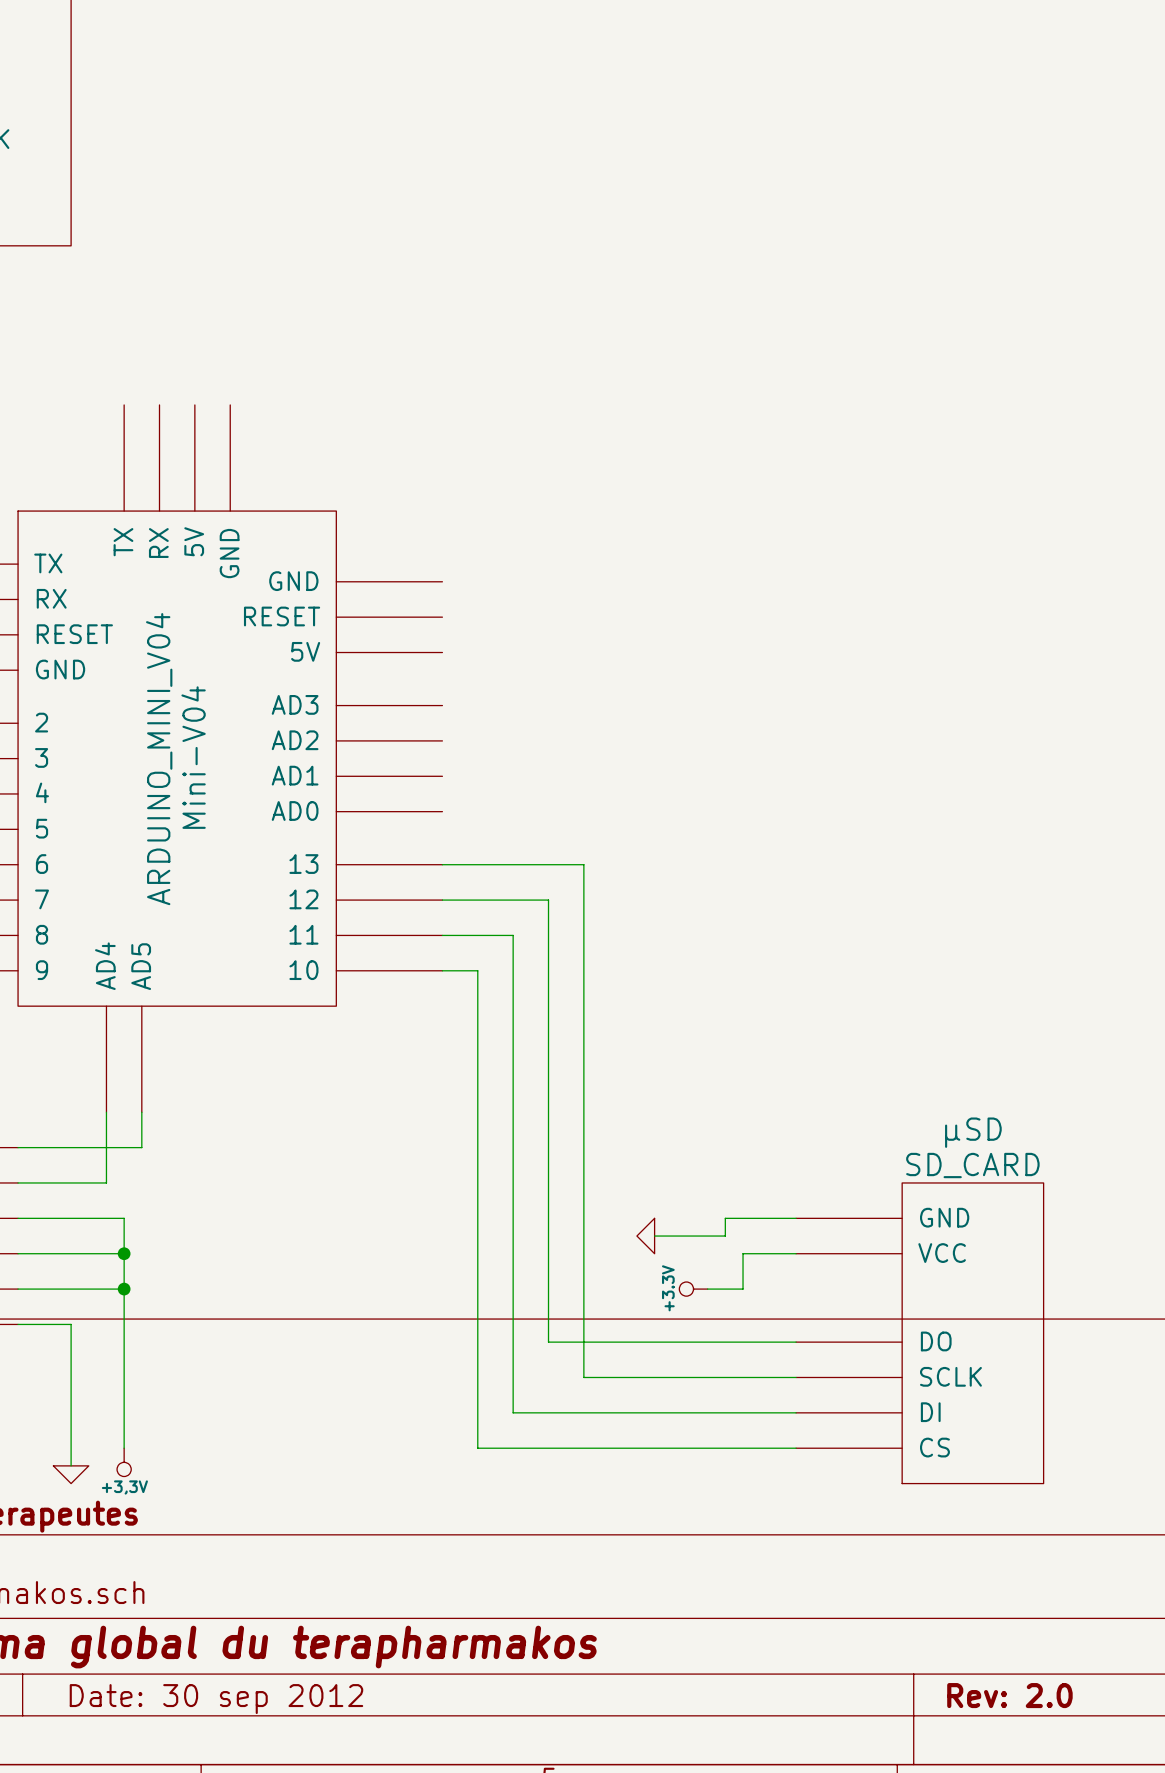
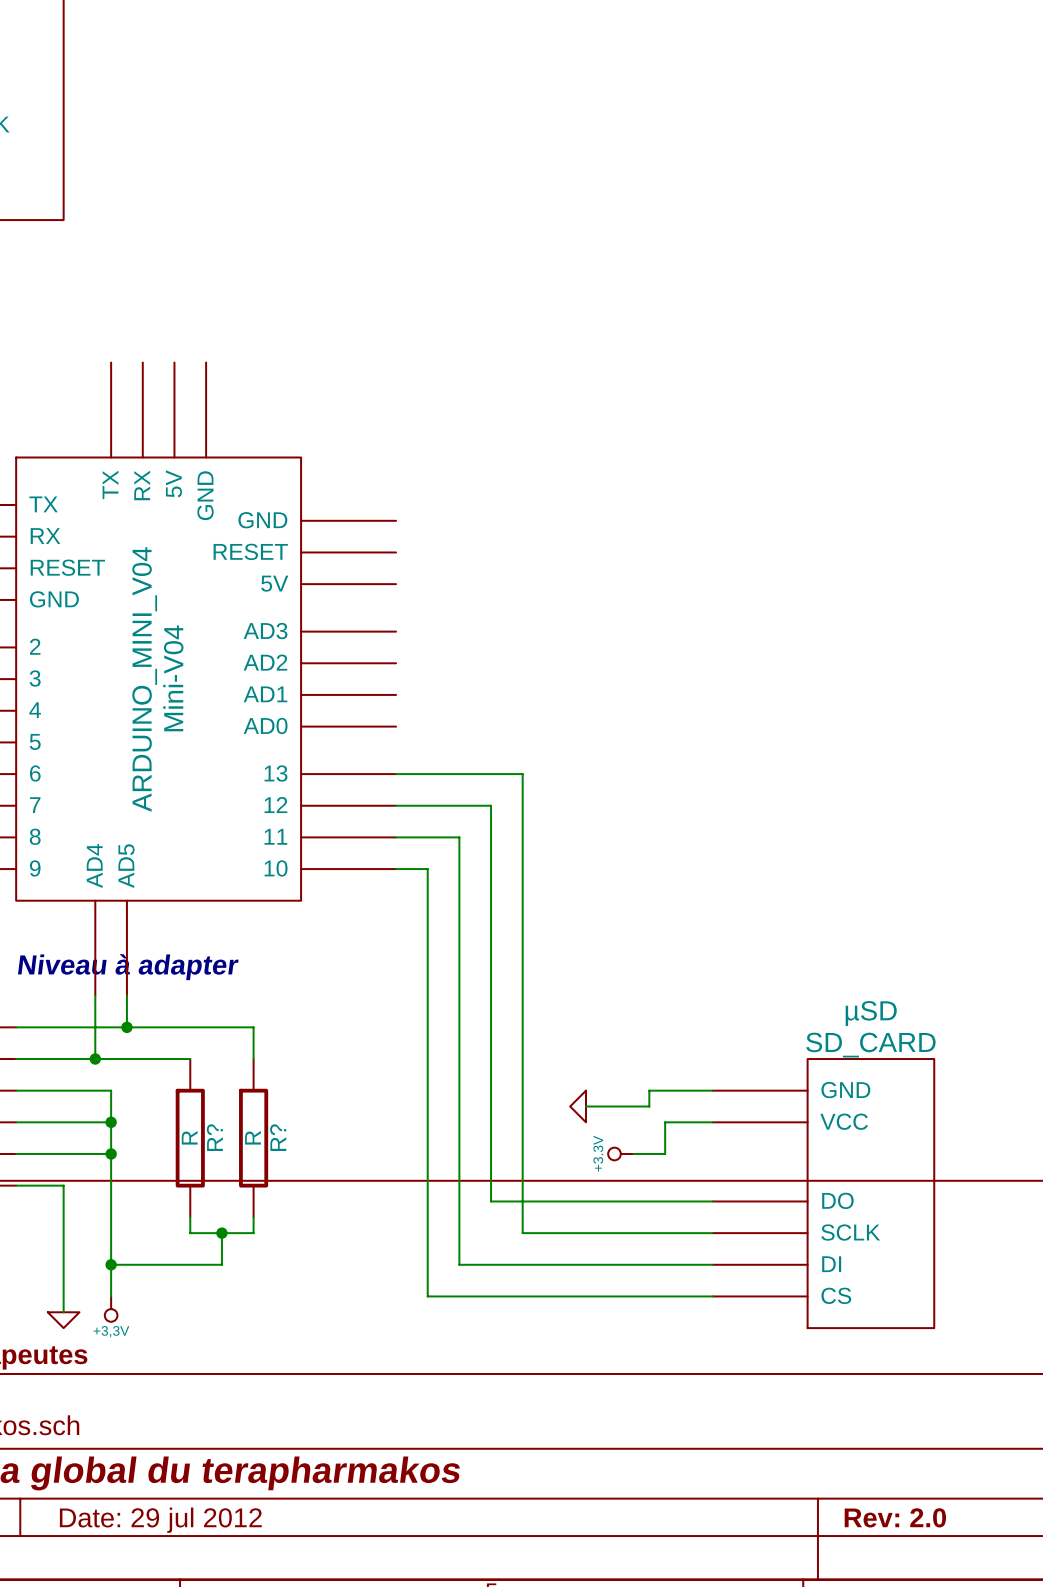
text: none -> Niveau à adapter (128, 967)
wire: none -> (126, 1027) (253, 1027) (253, 1059)
junction: none -> (126, 1027)
wire: none -> (95, 1059) (190, 1059)
junction: none -> (95, 1059)
R?: none -> R (190, 1138)
R?: none -> R (253, 1138)
wire: none -> (190, 1217) (190, 1233) (253, 1233) (253, 1217)
wire: none -> (221, 1233) (221, 1264) (111, 1264)
junction: none -> (221, 1233)
junction: none -> (111, 1264)
title block: Date: 30 sep 2012 (216, 1699) -> Date: 29 jul 2012 (160, 1520)

